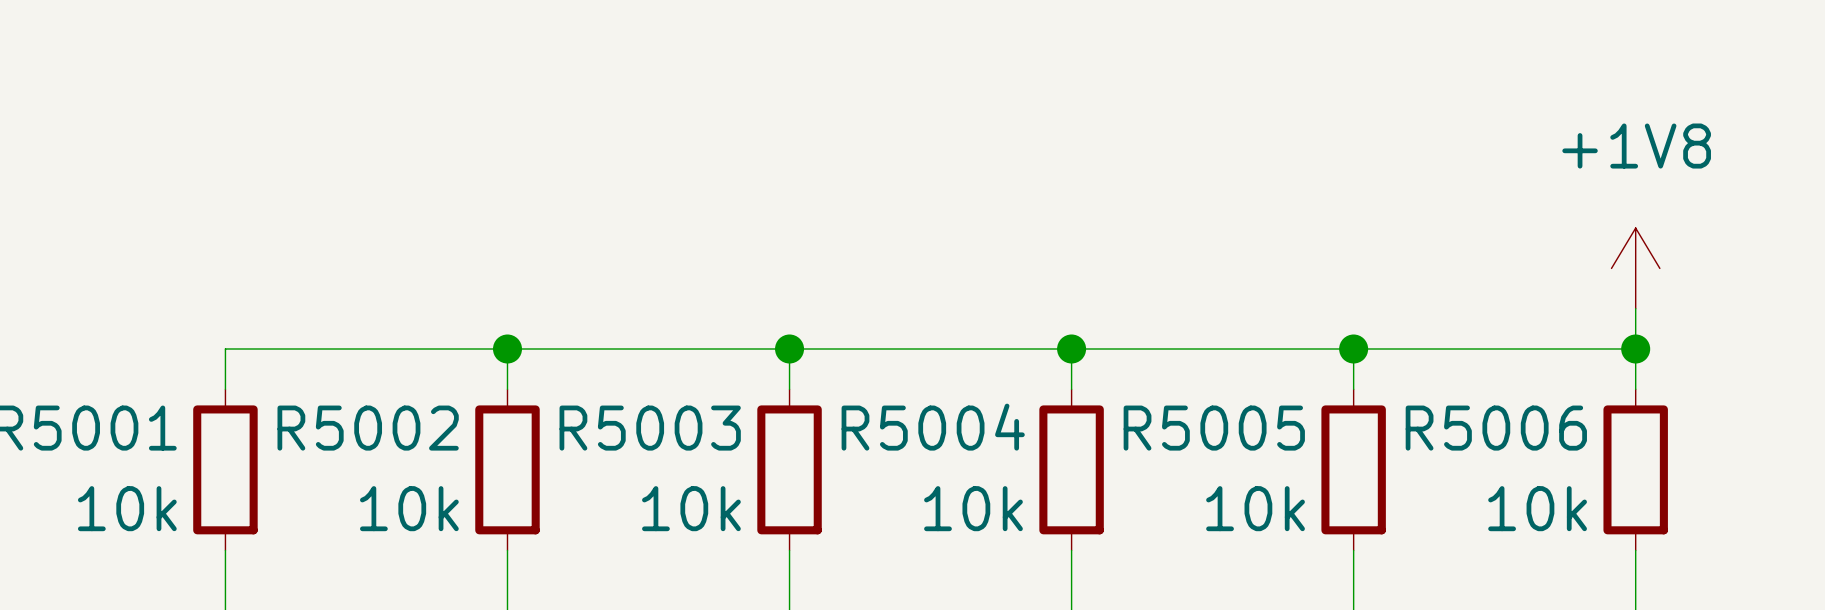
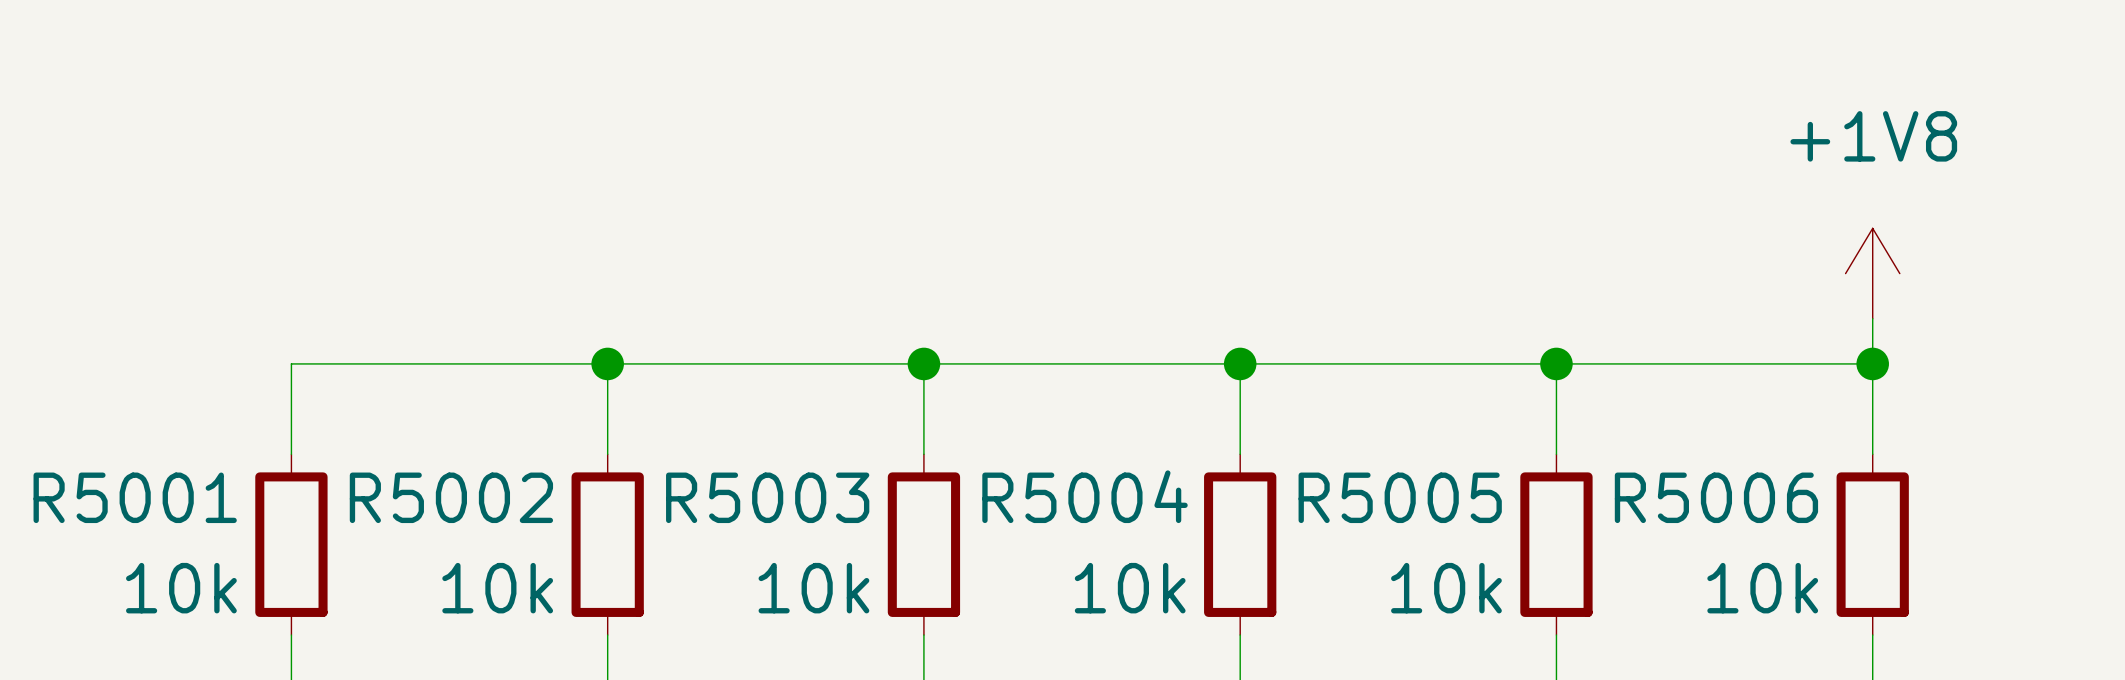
power symbol position: +1V8 (1635, 268) -> +1V8 (1872, 273)
wire: none -> (607, 363) (607, 409)
wire: none -> (923, 363) (923, 409)
wire: none -> (1240, 363) (1240, 409)
wire: none -> (1556, 363) (1556, 409)
wire: (225, 348) (1635, 348) -> (291, 409) (291, 363) (1872, 363) (1872, 318)
junction position: (507, 348) -> (607, 363)
junction position: (789, 348) -> (923, 363)
junction position: (1071, 348) -> (1240, 363)
junction position: (1353, 348) -> (1556, 363)
junction position: (1635, 348) -> (1872, 363)

